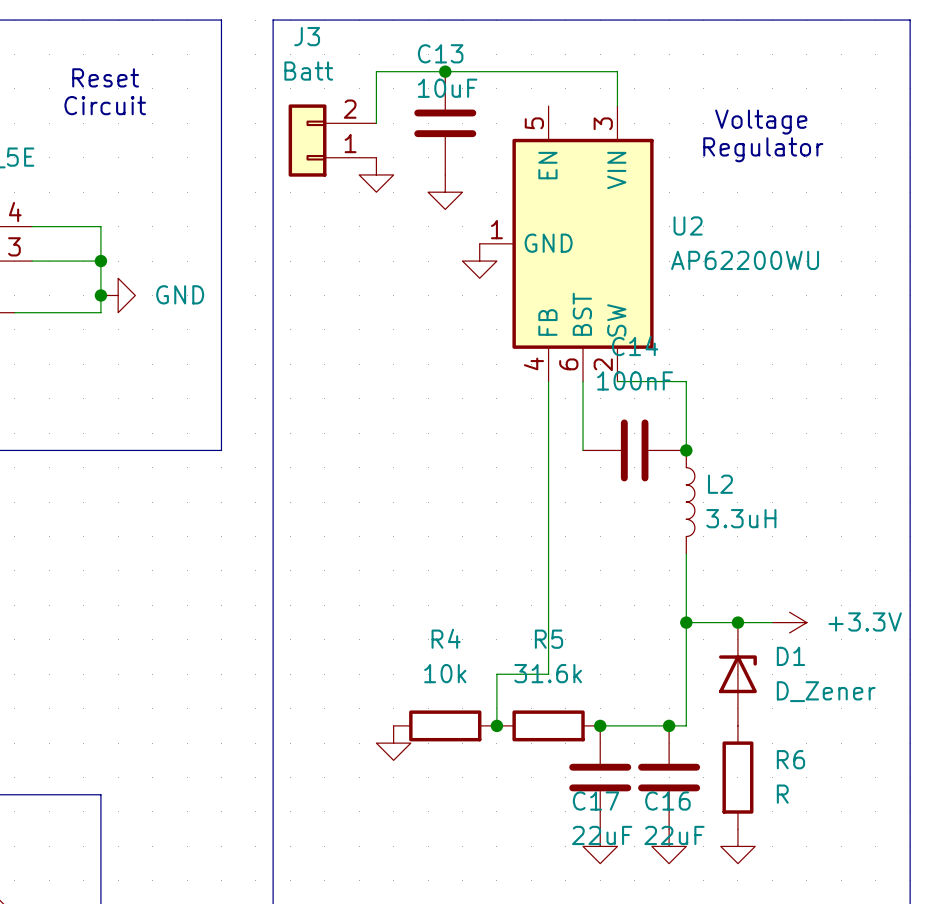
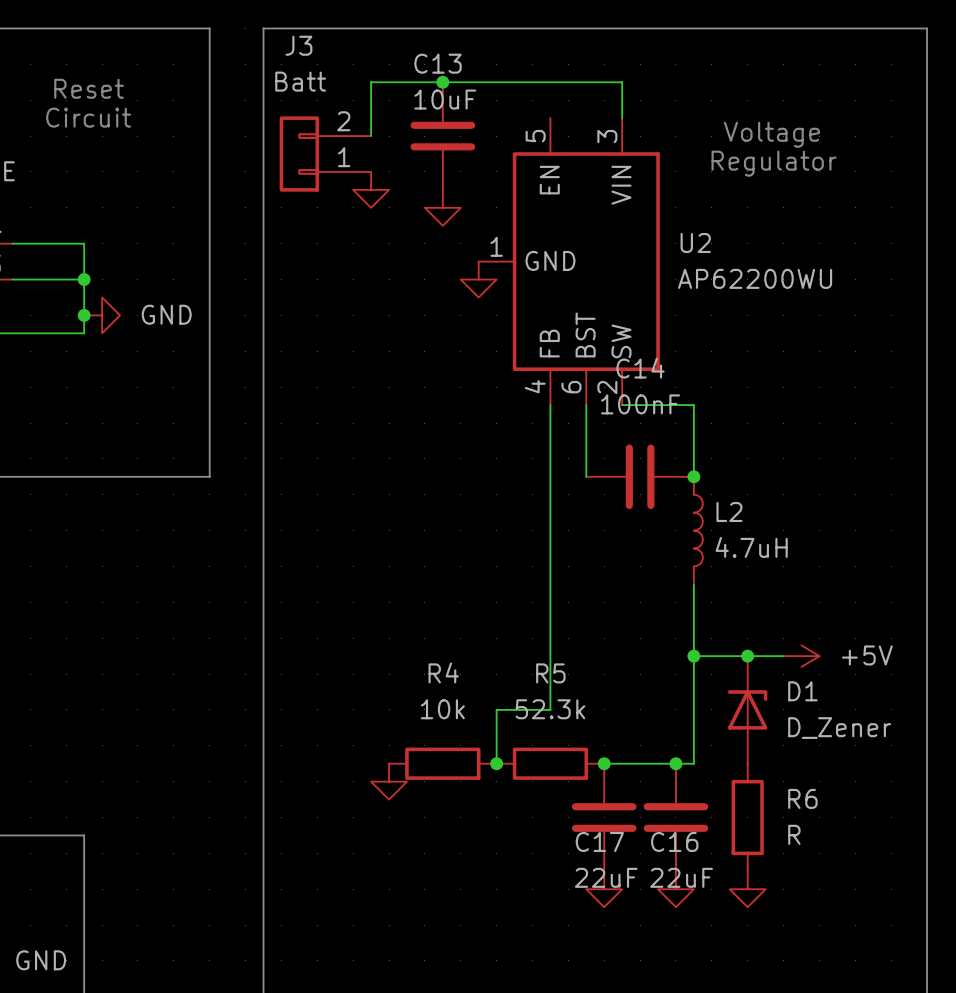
L2 value: 3.3uH (741, 518) -> 4.7uH (751, 547)
power symbol: +3.3V (789, 622) -> +5V (801, 656)
R5 value: 31.6k (548, 673) -> 52.3k (550, 709)

